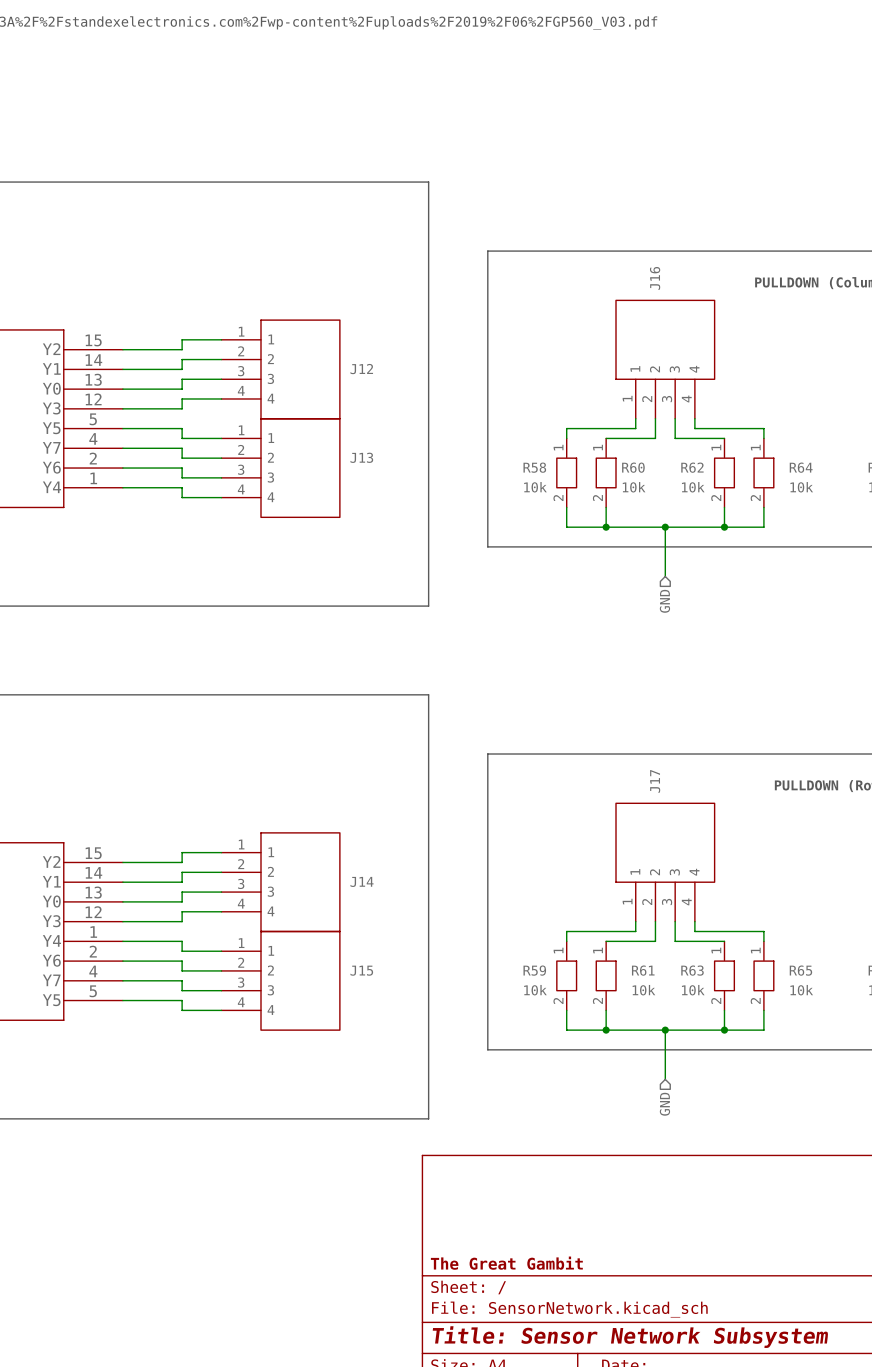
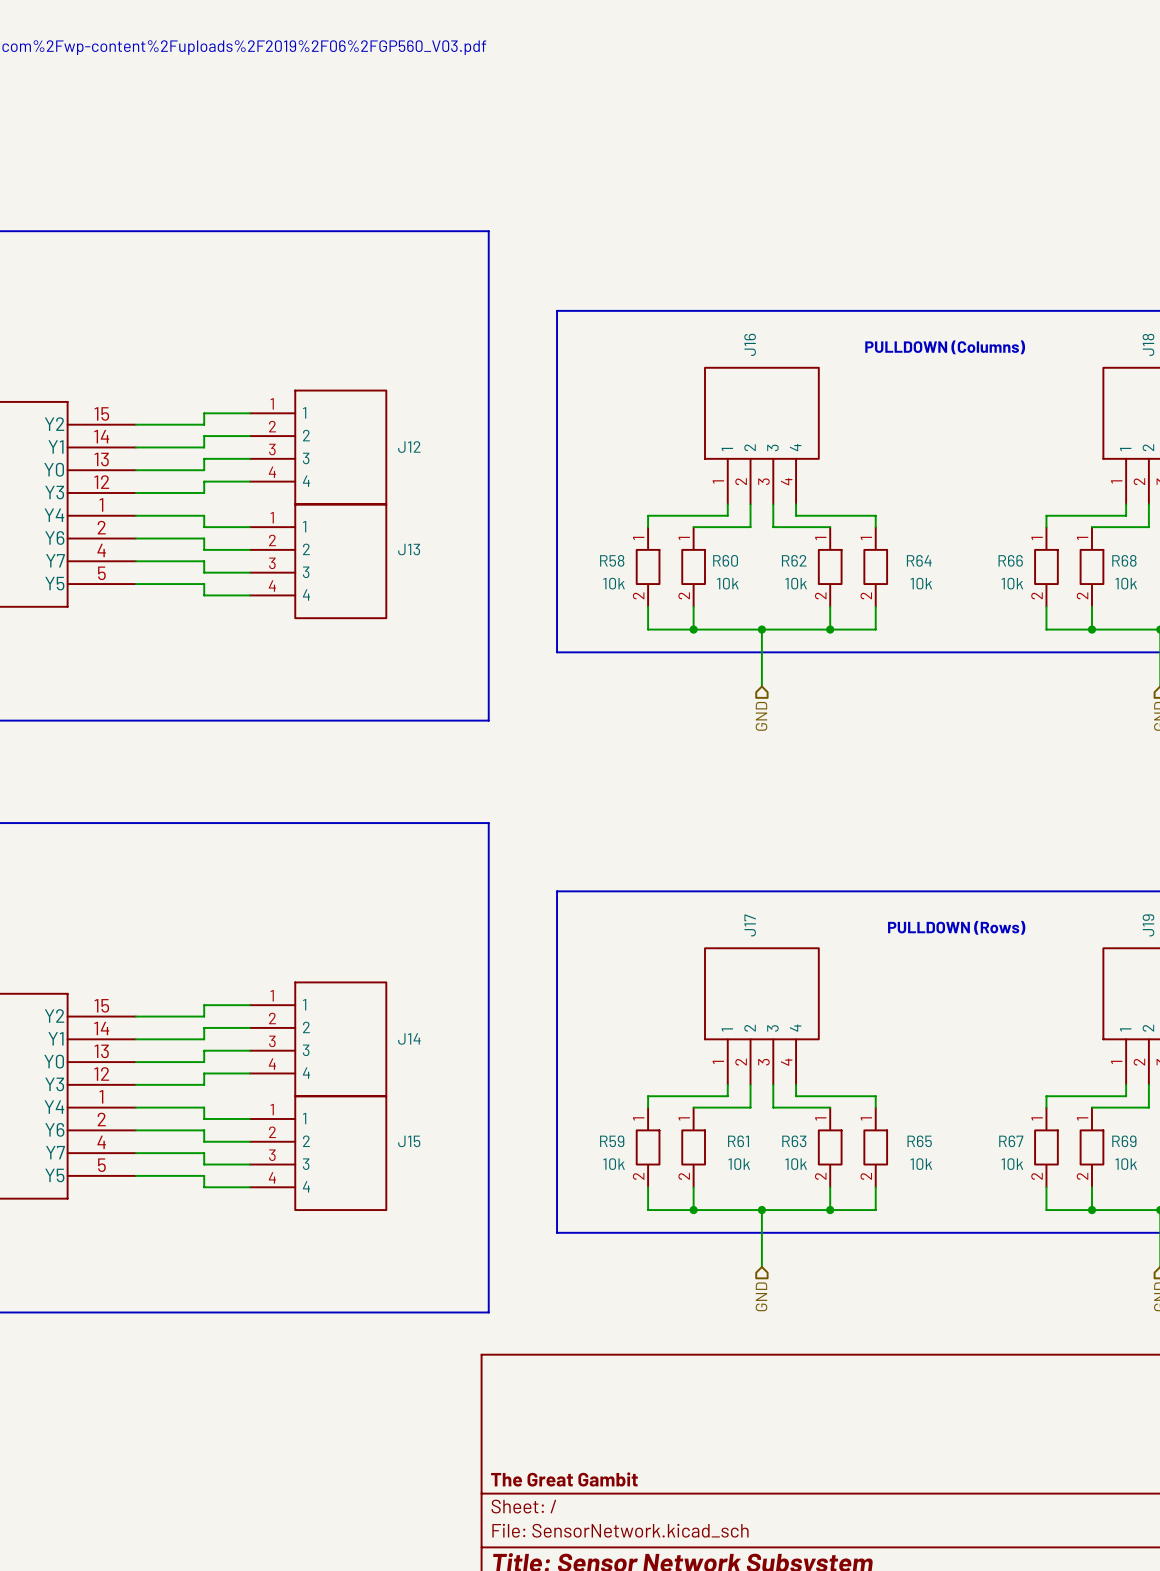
part pin number: 5 (93, 419) -> 1 (101, 504)
part pin name: Y5 (51, 428) -> Y4 (54, 515)
part pin number: 4 (93, 438) -> 2 (101, 527)
part pin name: Y7 (51, 447) -> Y6 (54, 538)
part pin number: 2 (93, 458) -> 4 (101, 550)
part pin name: Y6 (51, 467) -> Y7 (55, 560)
part pin number: 1 (93, 478) -> 5 (101, 573)
part pin name: Y4 (51, 487) -> Y5 (54, 583)

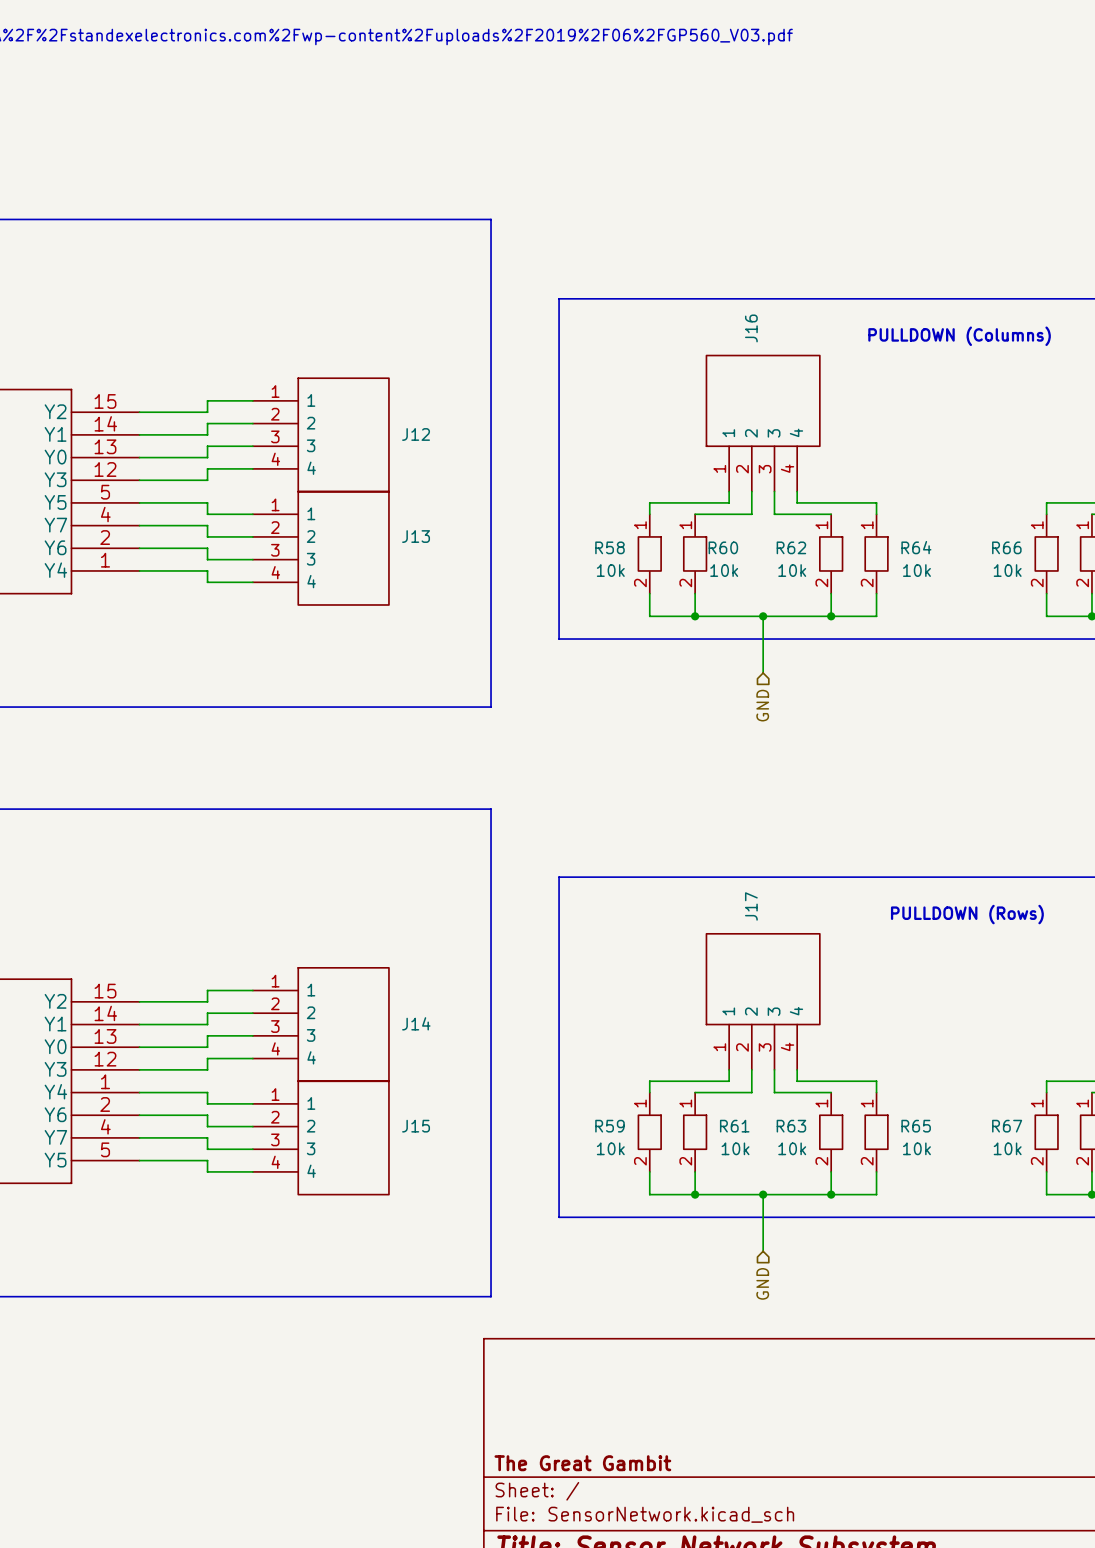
part pin number: 1 (101, 504) -> 5 (105, 492)
part pin name: Y4 (54, 515) -> Y5 (55, 502)
part pin number: 2 (101, 527) -> 4 (105, 514)
part pin name: Y6 (54, 538) -> Y7 (55, 525)
part pin number: 4 (101, 550) -> 2 (105, 537)
part pin name: Y7 (55, 560) -> Y6 (55, 547)
part pin number: 5 (101, 573) -> 1 (105, 560)
part pin name: Y5 (54, 583) -> Y4 (55, 570)

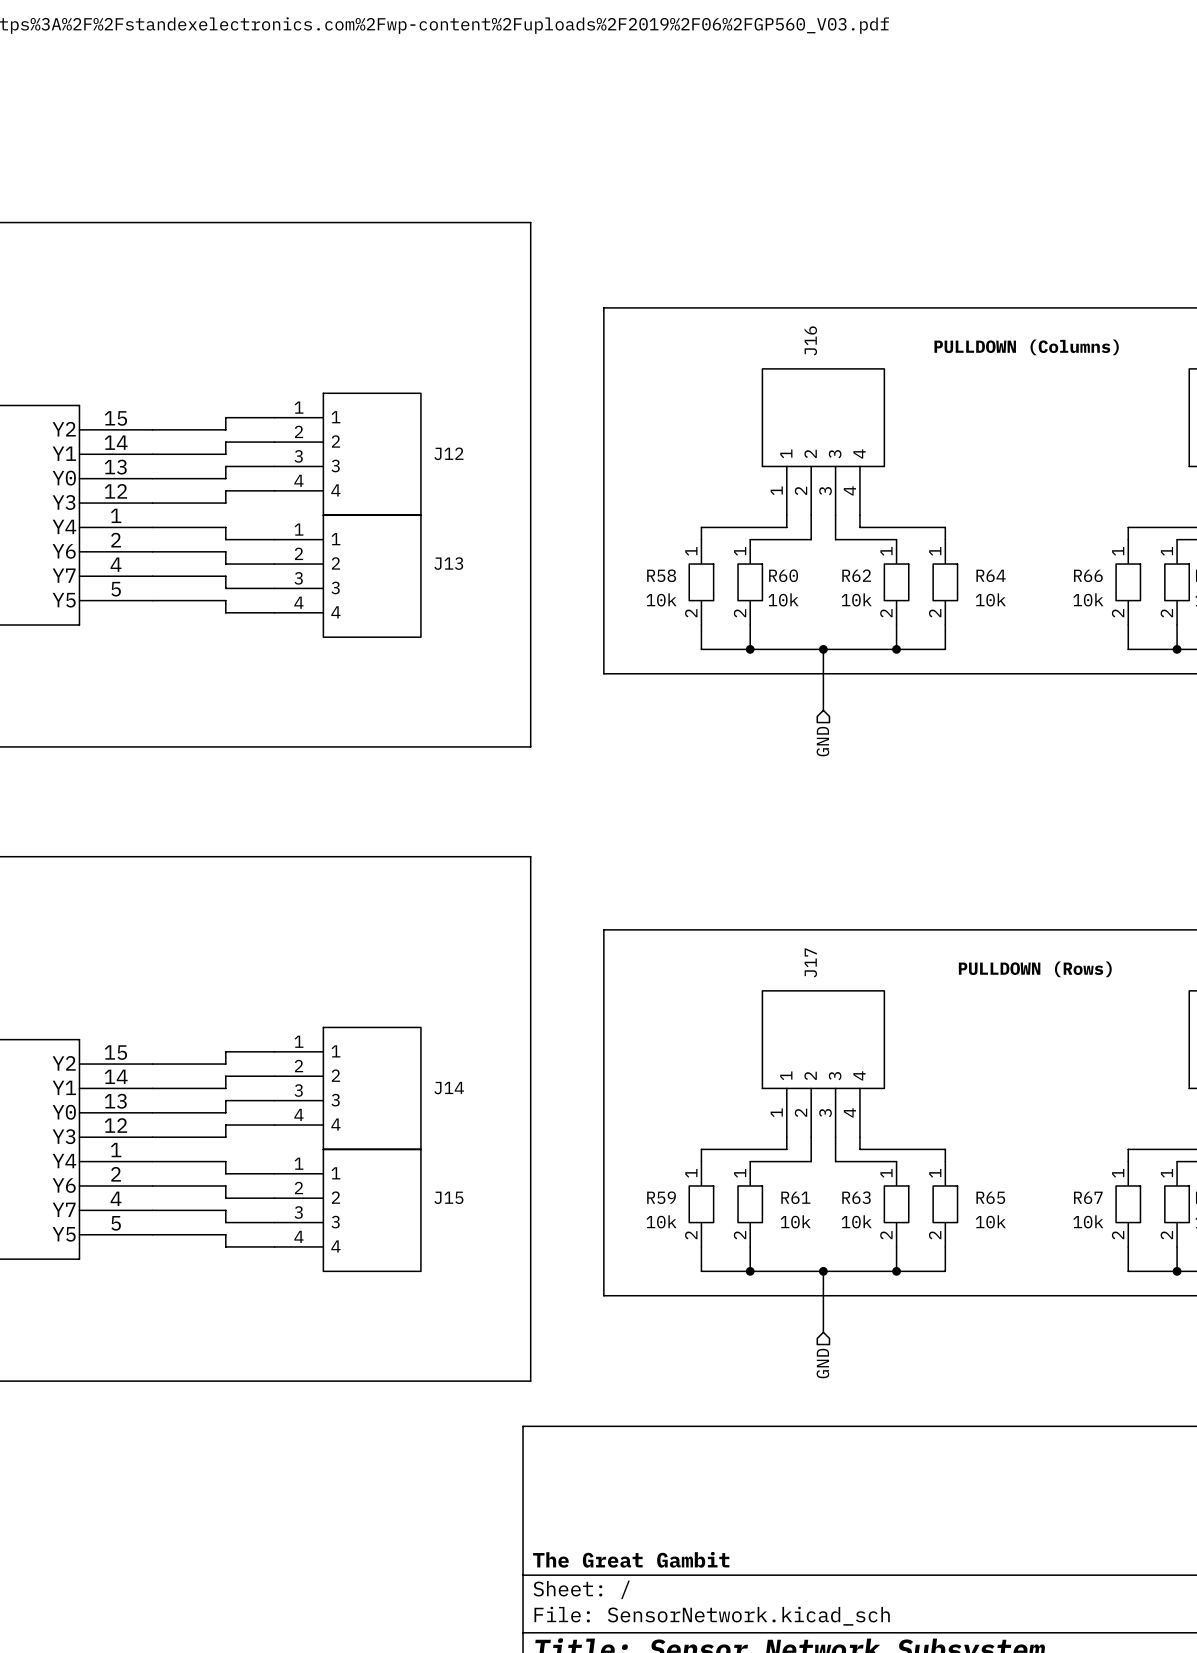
part pin number: 5 (105, 492) -> 1 (116, 515)
part pin name: Y5 (55, 502) -> Y4 (64, 526)
part pin number: 4 (105, 514) -> 2 (116, 540)
part pin name: Y7 (55, 525) -> Y6 (64, 551)
part pin number: 2 (105, 537) -> 4 (116, 564)
part pin name: Y6 (55, 547) -> Y7 (64, 575)
part pin number: 1 (105, 560) -> 5 (116, 589)
part pin name: Y4 (55, 570) -> Y5 (64, 600)

